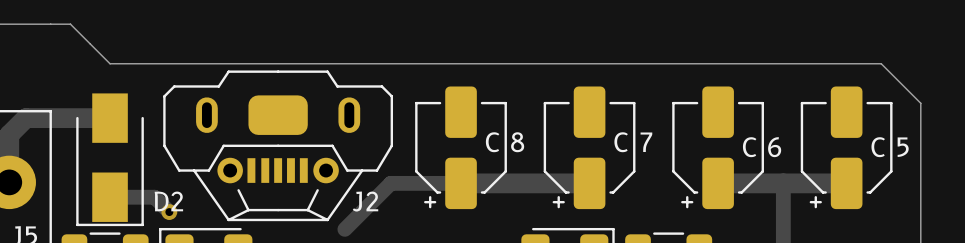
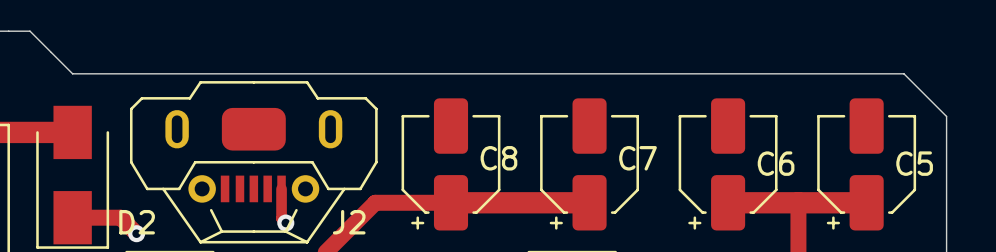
C 8 name: C 8 (505, 142) -> C8 (498, 158)
C 7 name: C 7 (633, 142) -> C7 (638, 158)
C 6 name: C 6 (762, 147) -> C6 (776, 163)
C 5 name: C 5 (890, 147) -> C5 (914, 163)
track: none -> (281, 192) (281, 188) (281, 218) (285, 223)
via: none -> (285, 223)

